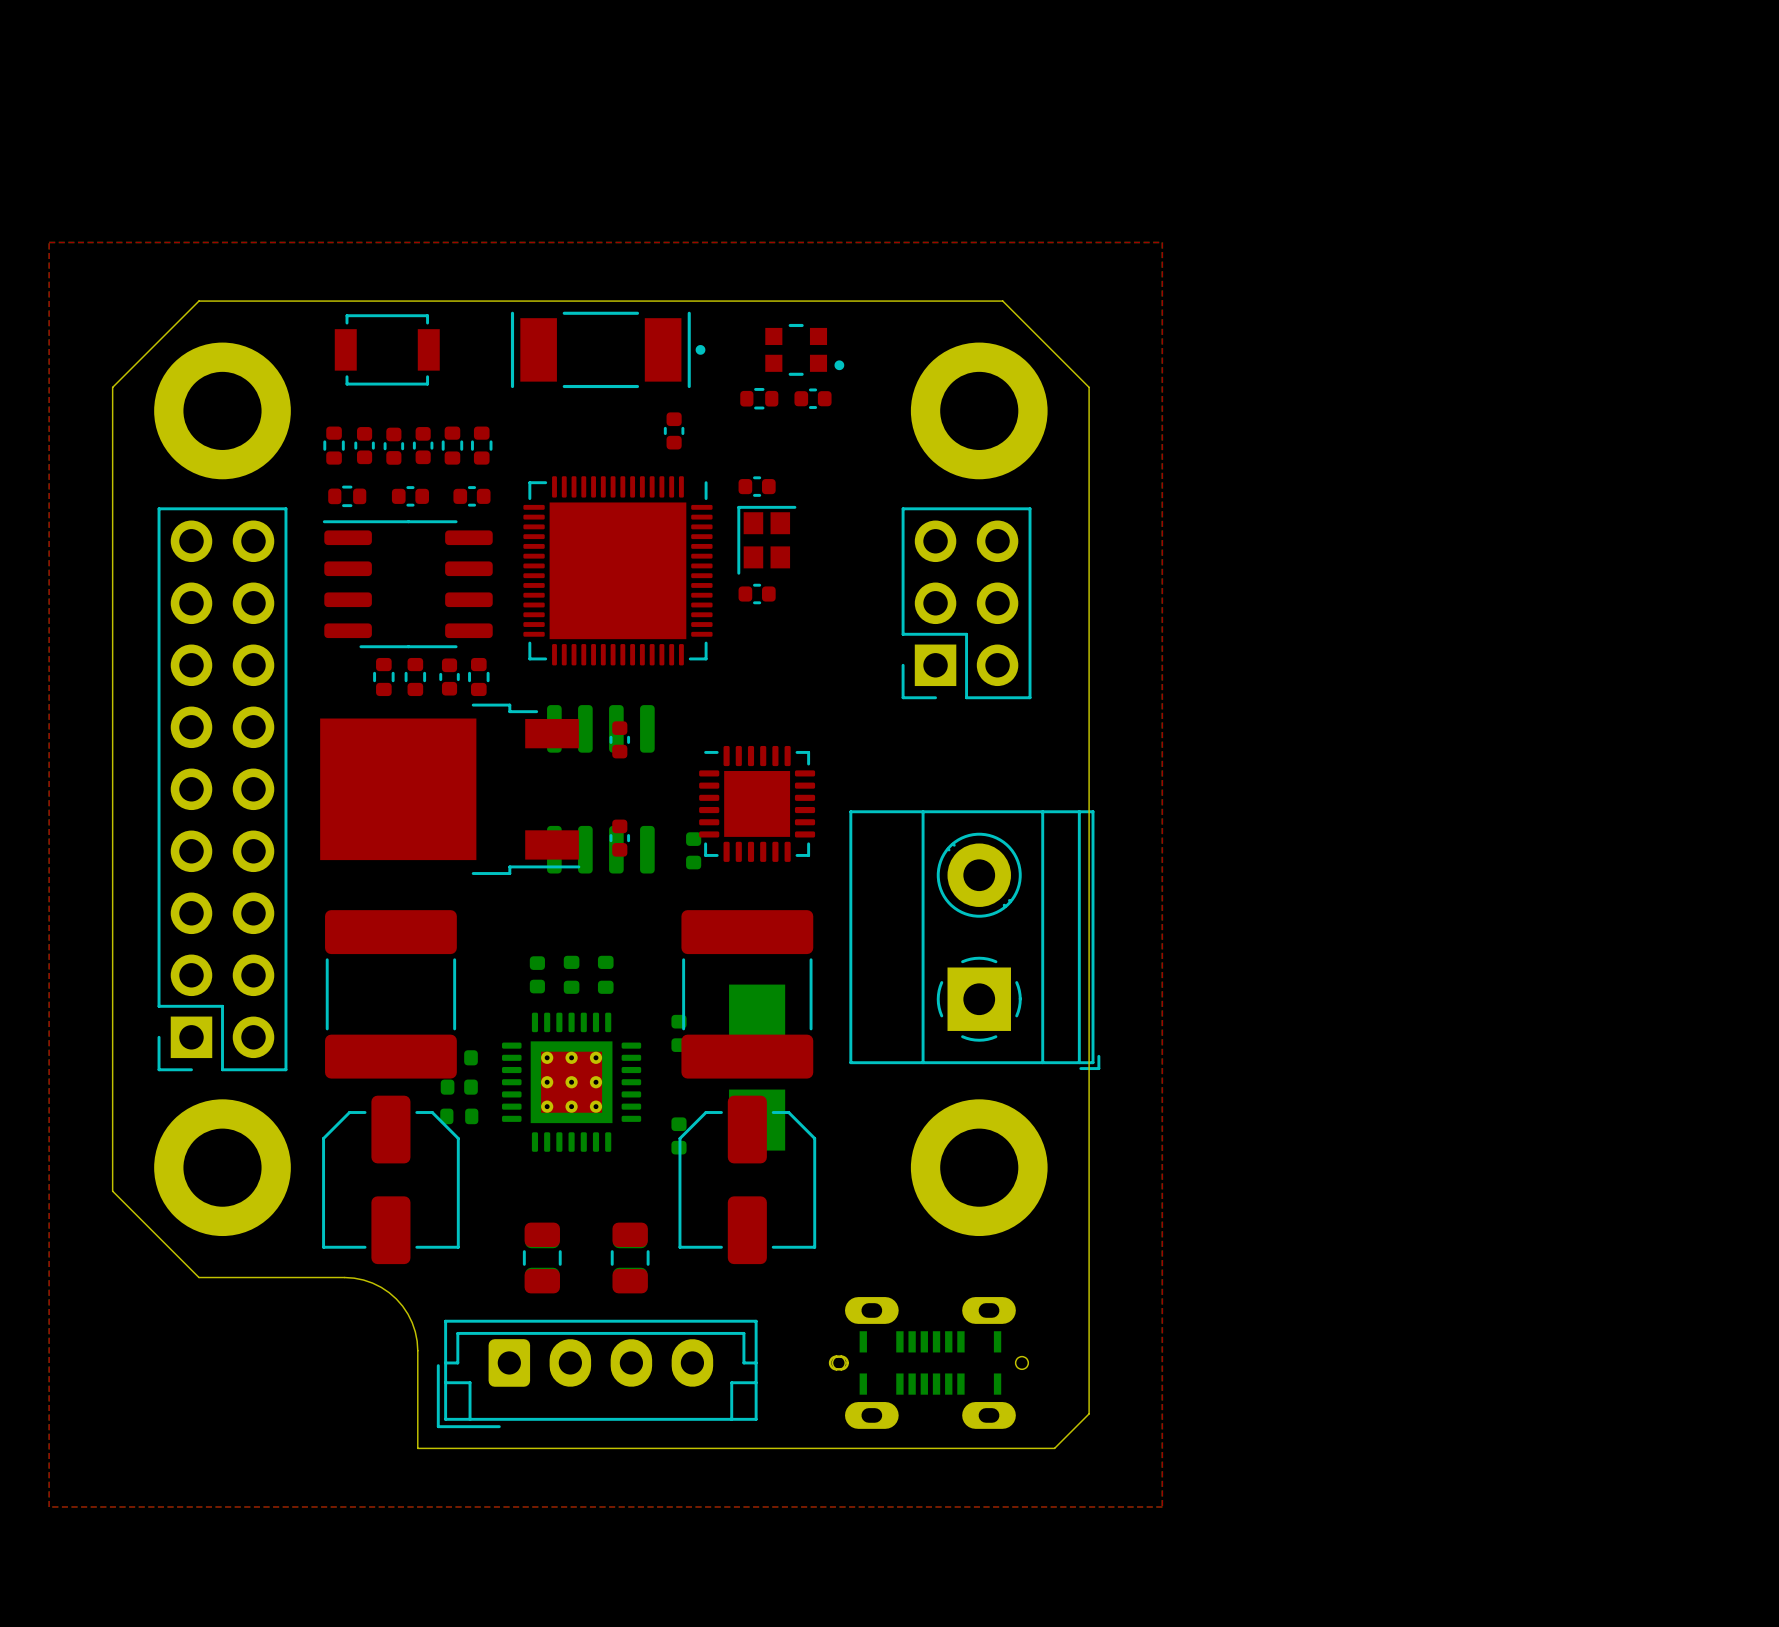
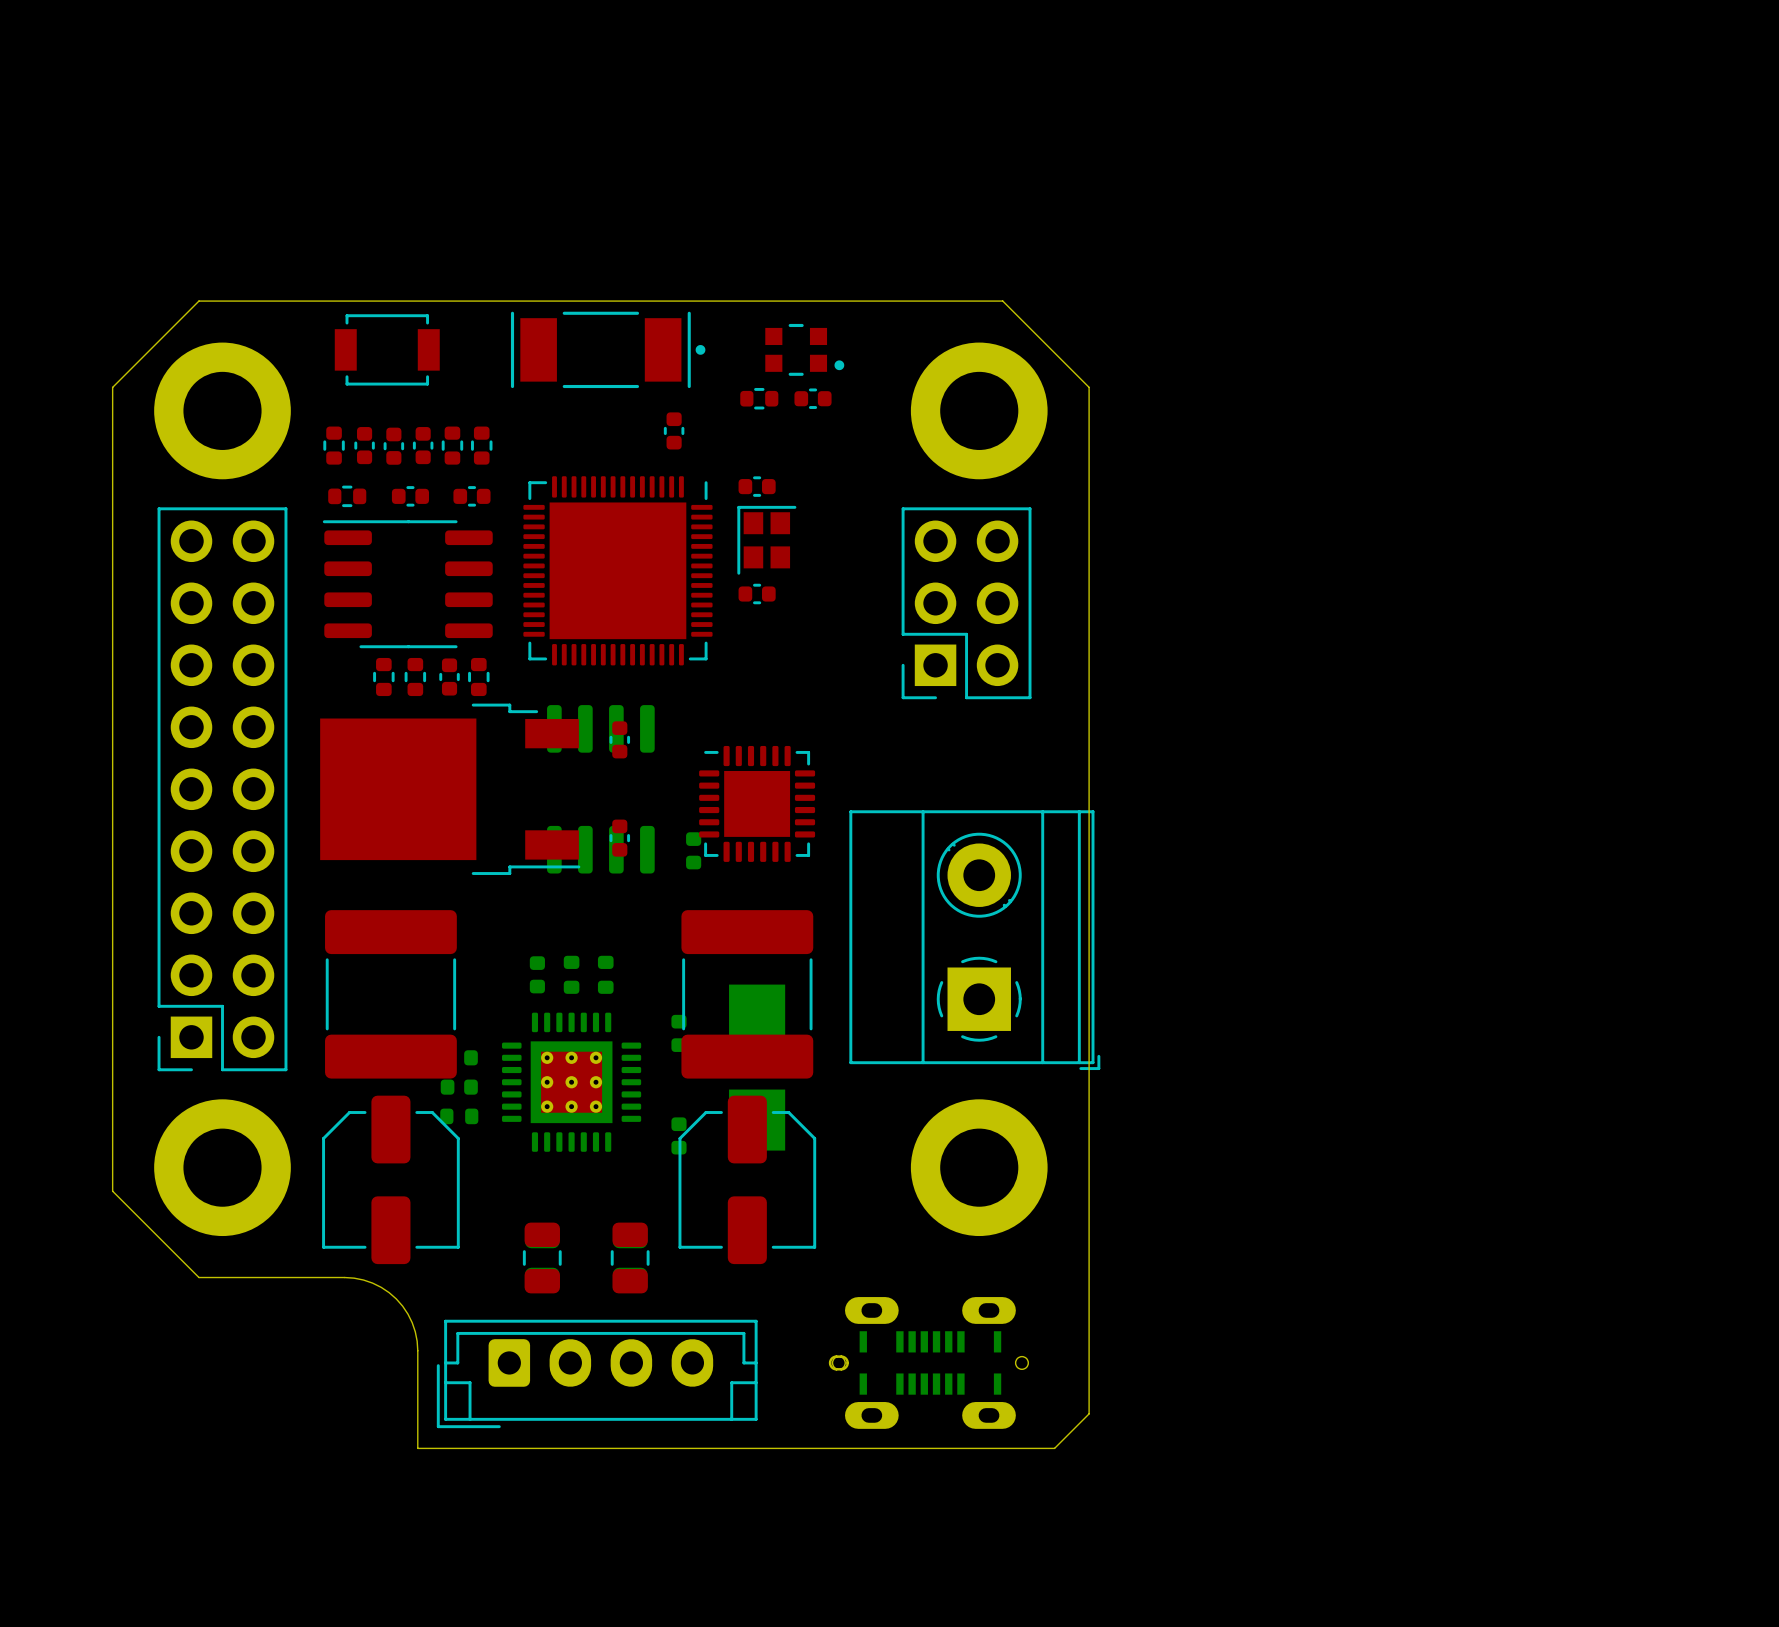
top zone outline: (49, 242) (49, 1506) (1162, 1506) (1162, 242) (49, 242) -> none

